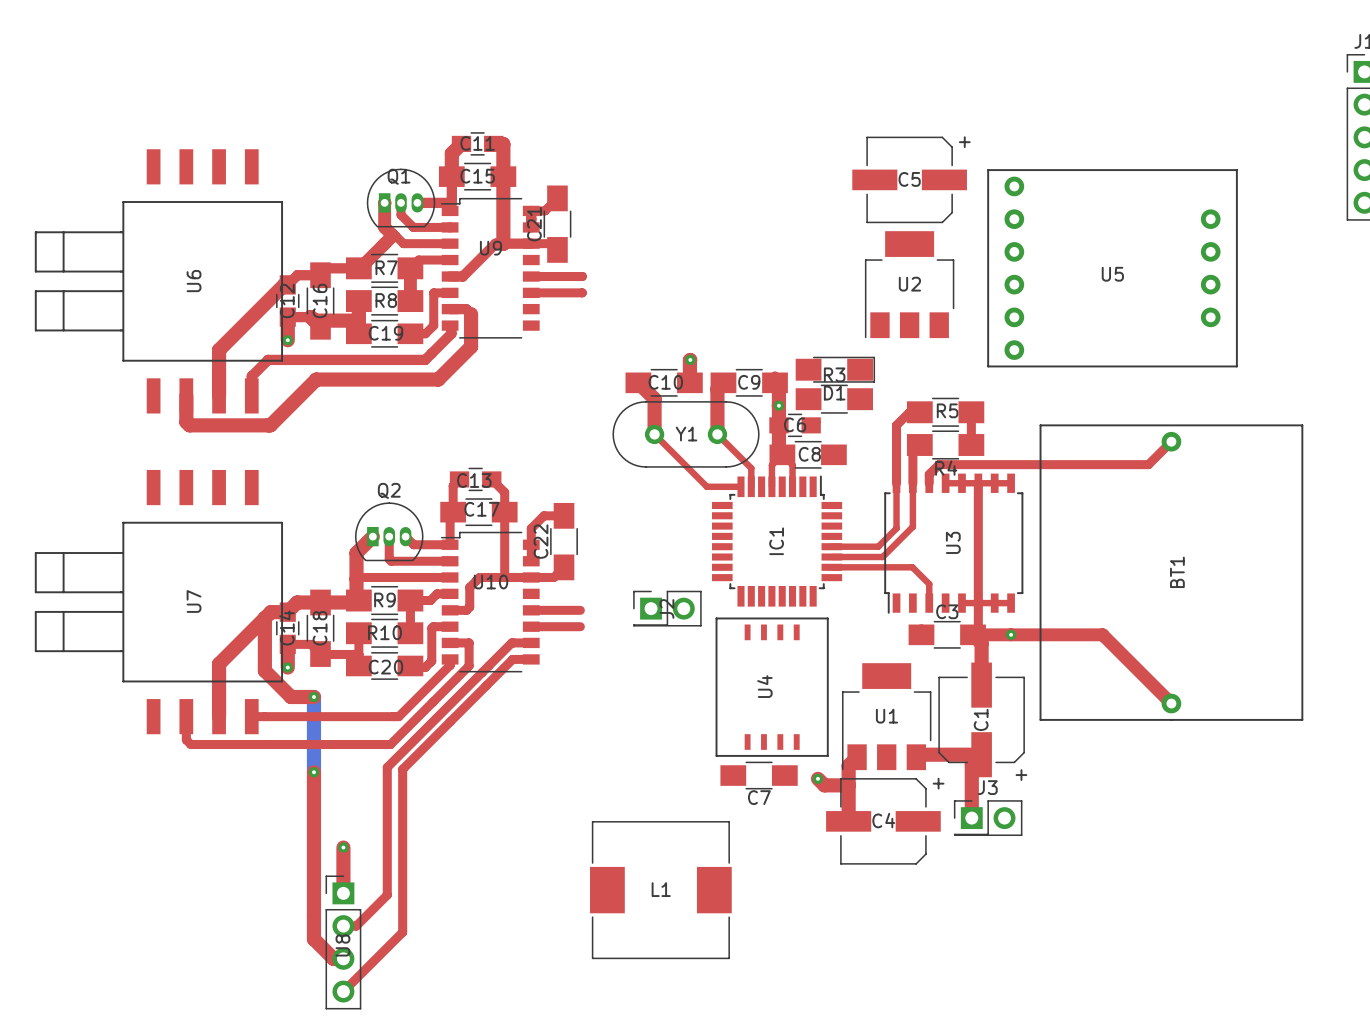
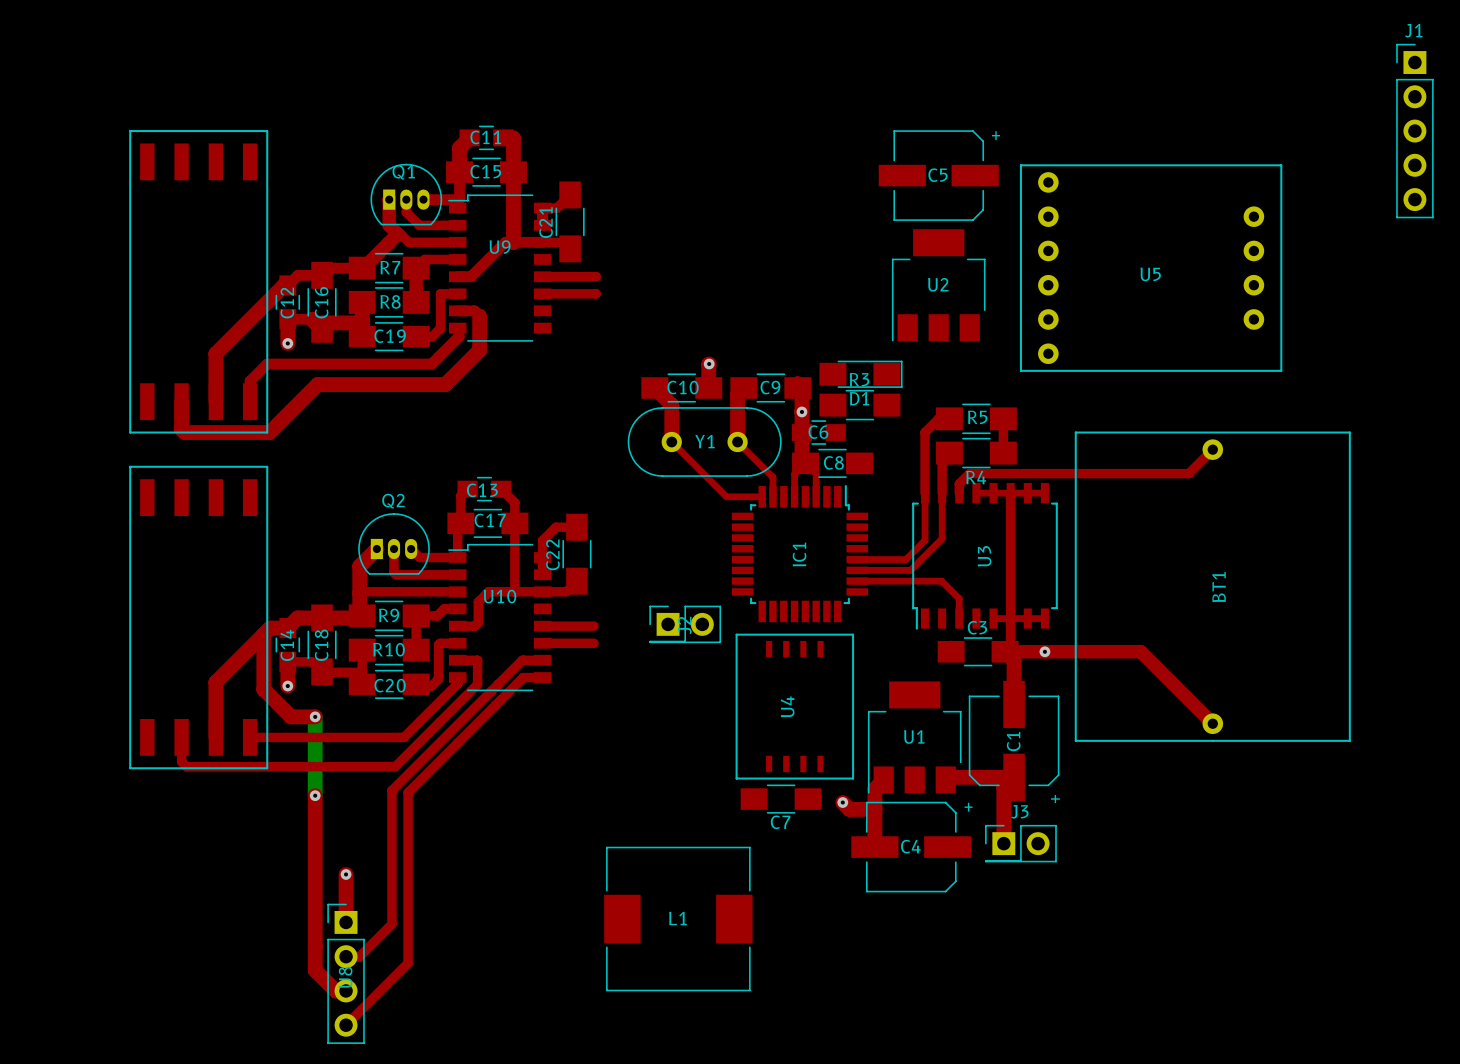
U6: (158, 281) -> none
part: none -> (198, 281)
U7: (158, 602) -> none
part: none -> (198, 617)

